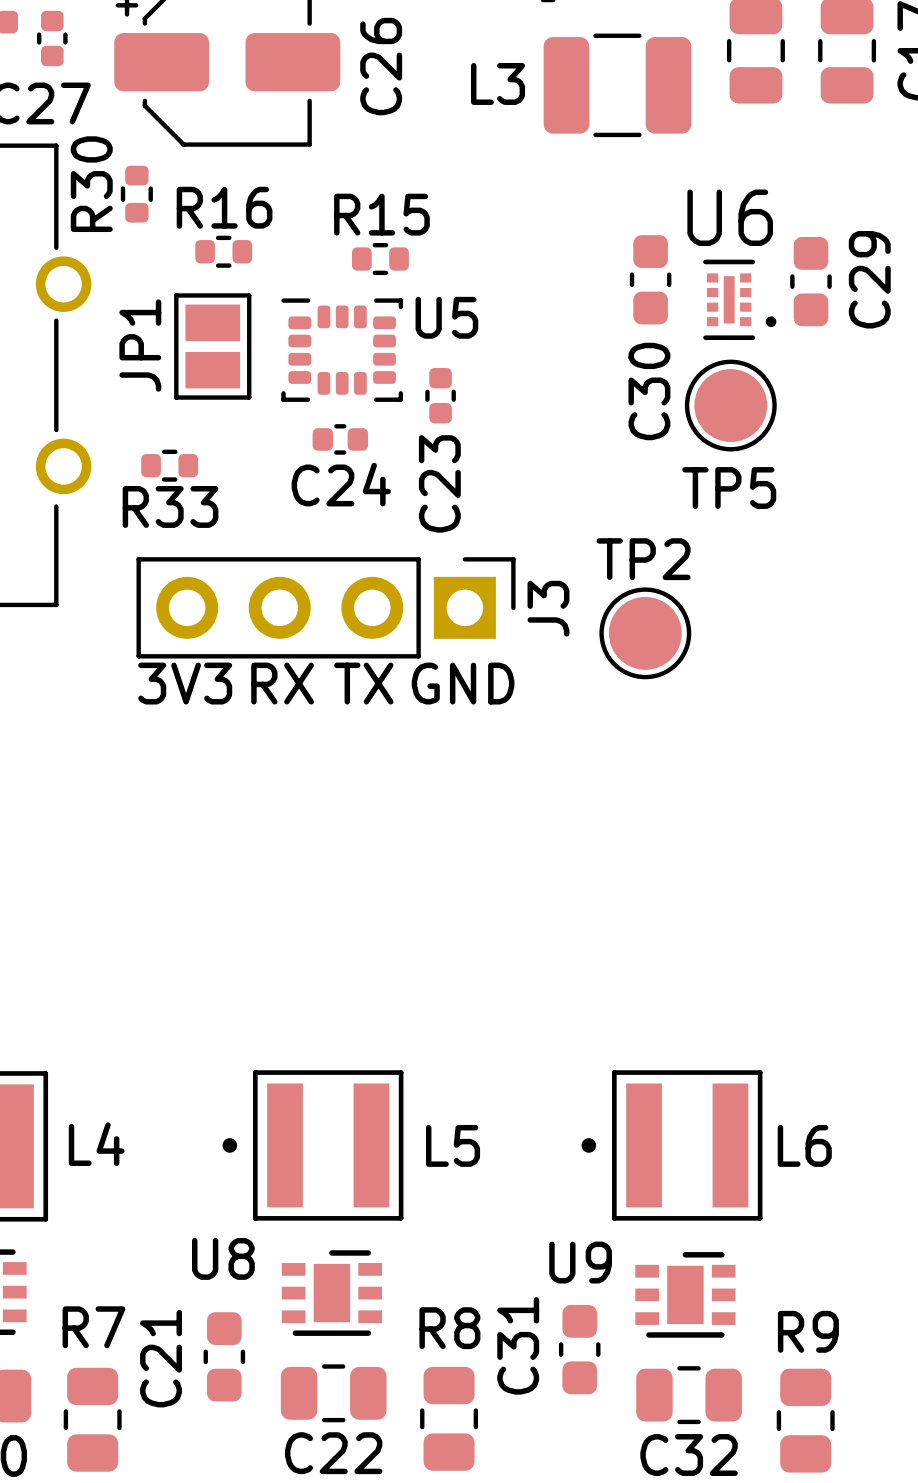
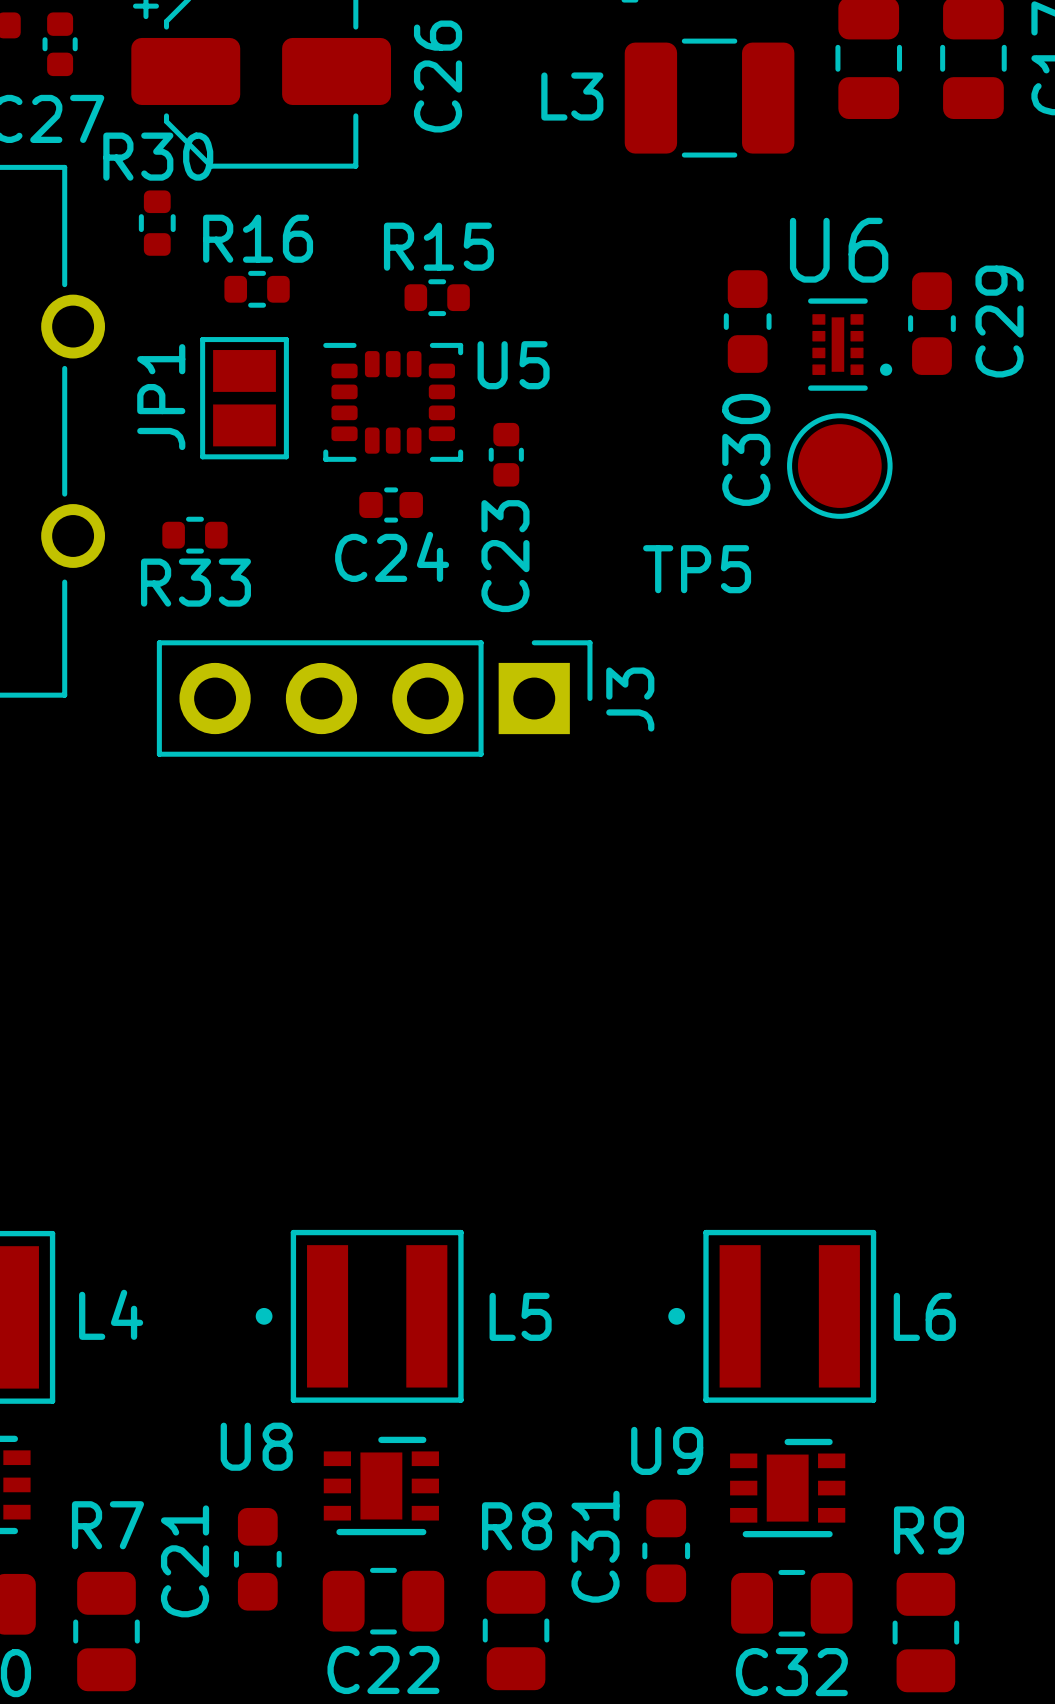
R30 name rotation: 0° (91, 184) -> 90° clockwise (158, 156)
TP5 name position: TP5 (729, 488) -> TP5 (697, 569)
TP2: (645, 633) -> none
text: 3V3 (185, 683) -> none
text: RX (282, 683) -> none
text: TX (363, 683) -> none
text: GND (463, 683) -> none

